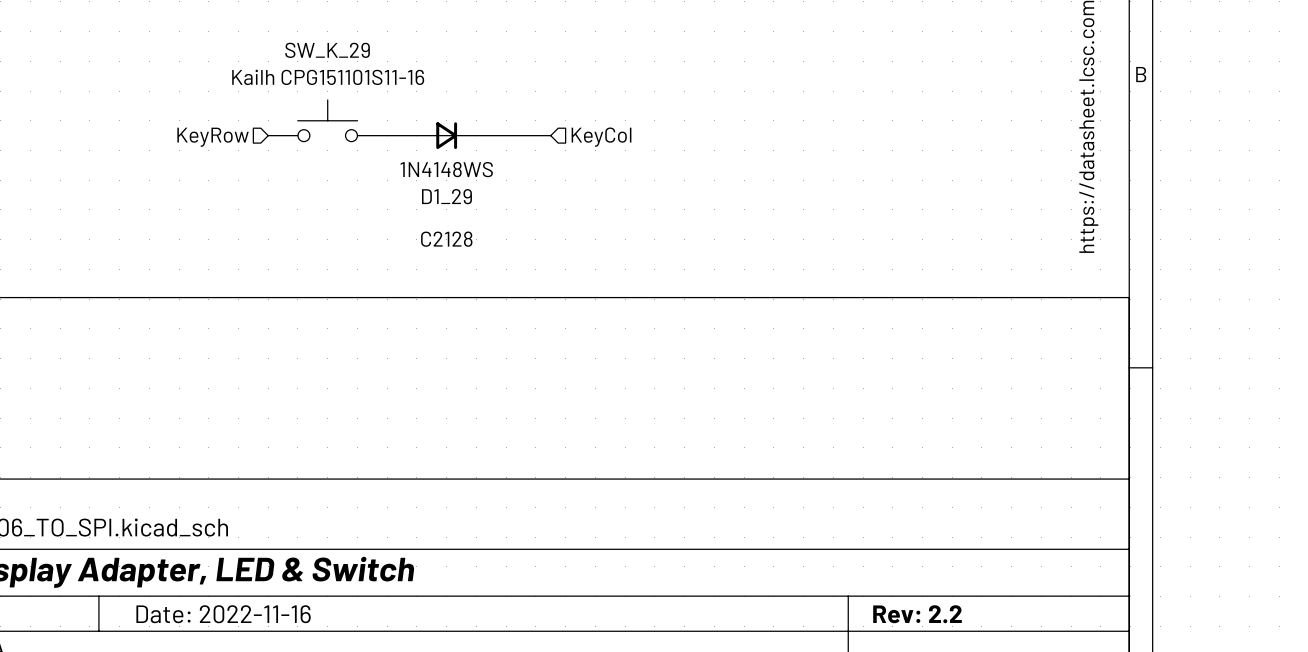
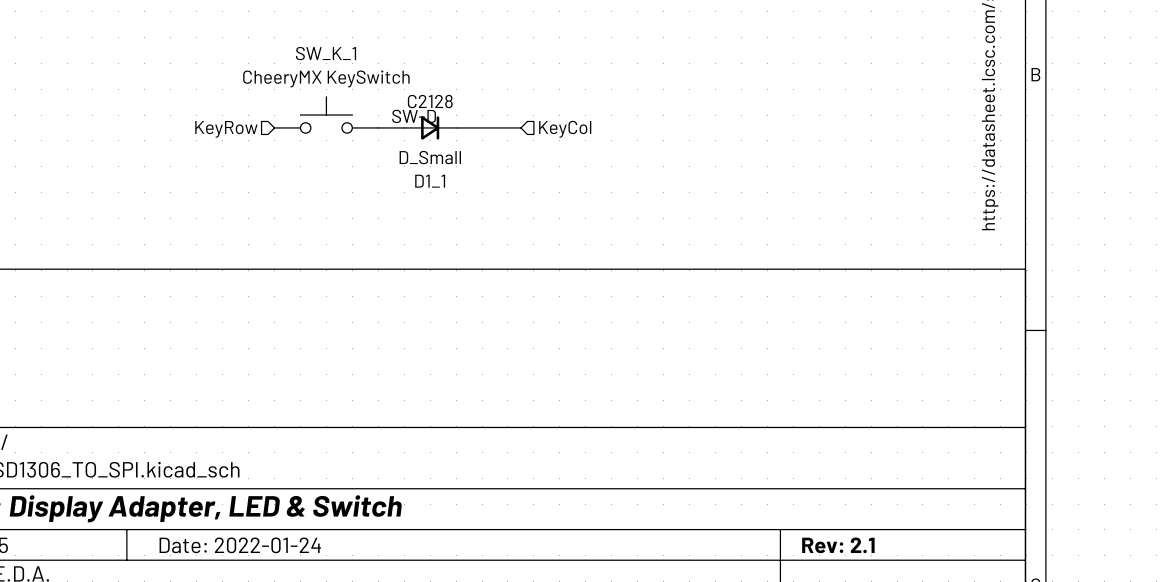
SW_K_29 name: SW_K_29 (327, 50) -> SW_K_1 (326, 53)
SW_K_29 value: Kailh CPG151101S11-16 (328, 77) -> CheeryMX KeySwitch (326, 78)
label: none -> SW-D (414, 116)
D1_29 value: 1N4148WS (446, 169) -> D_Small (430, 157)
D1_29 name: D1_29 (446, 196) -> D1_1 (430, 181)
D1_29 text position: C2128 (446, 239) -> C2128 (430, 101)
title block: Date: 2022-11-16 (223, 614) -> Date: 2022-01-24 (240, 545)
title block: Rev: 2.2 (917, 614) -> Rev: 2.1 (838, 545)

